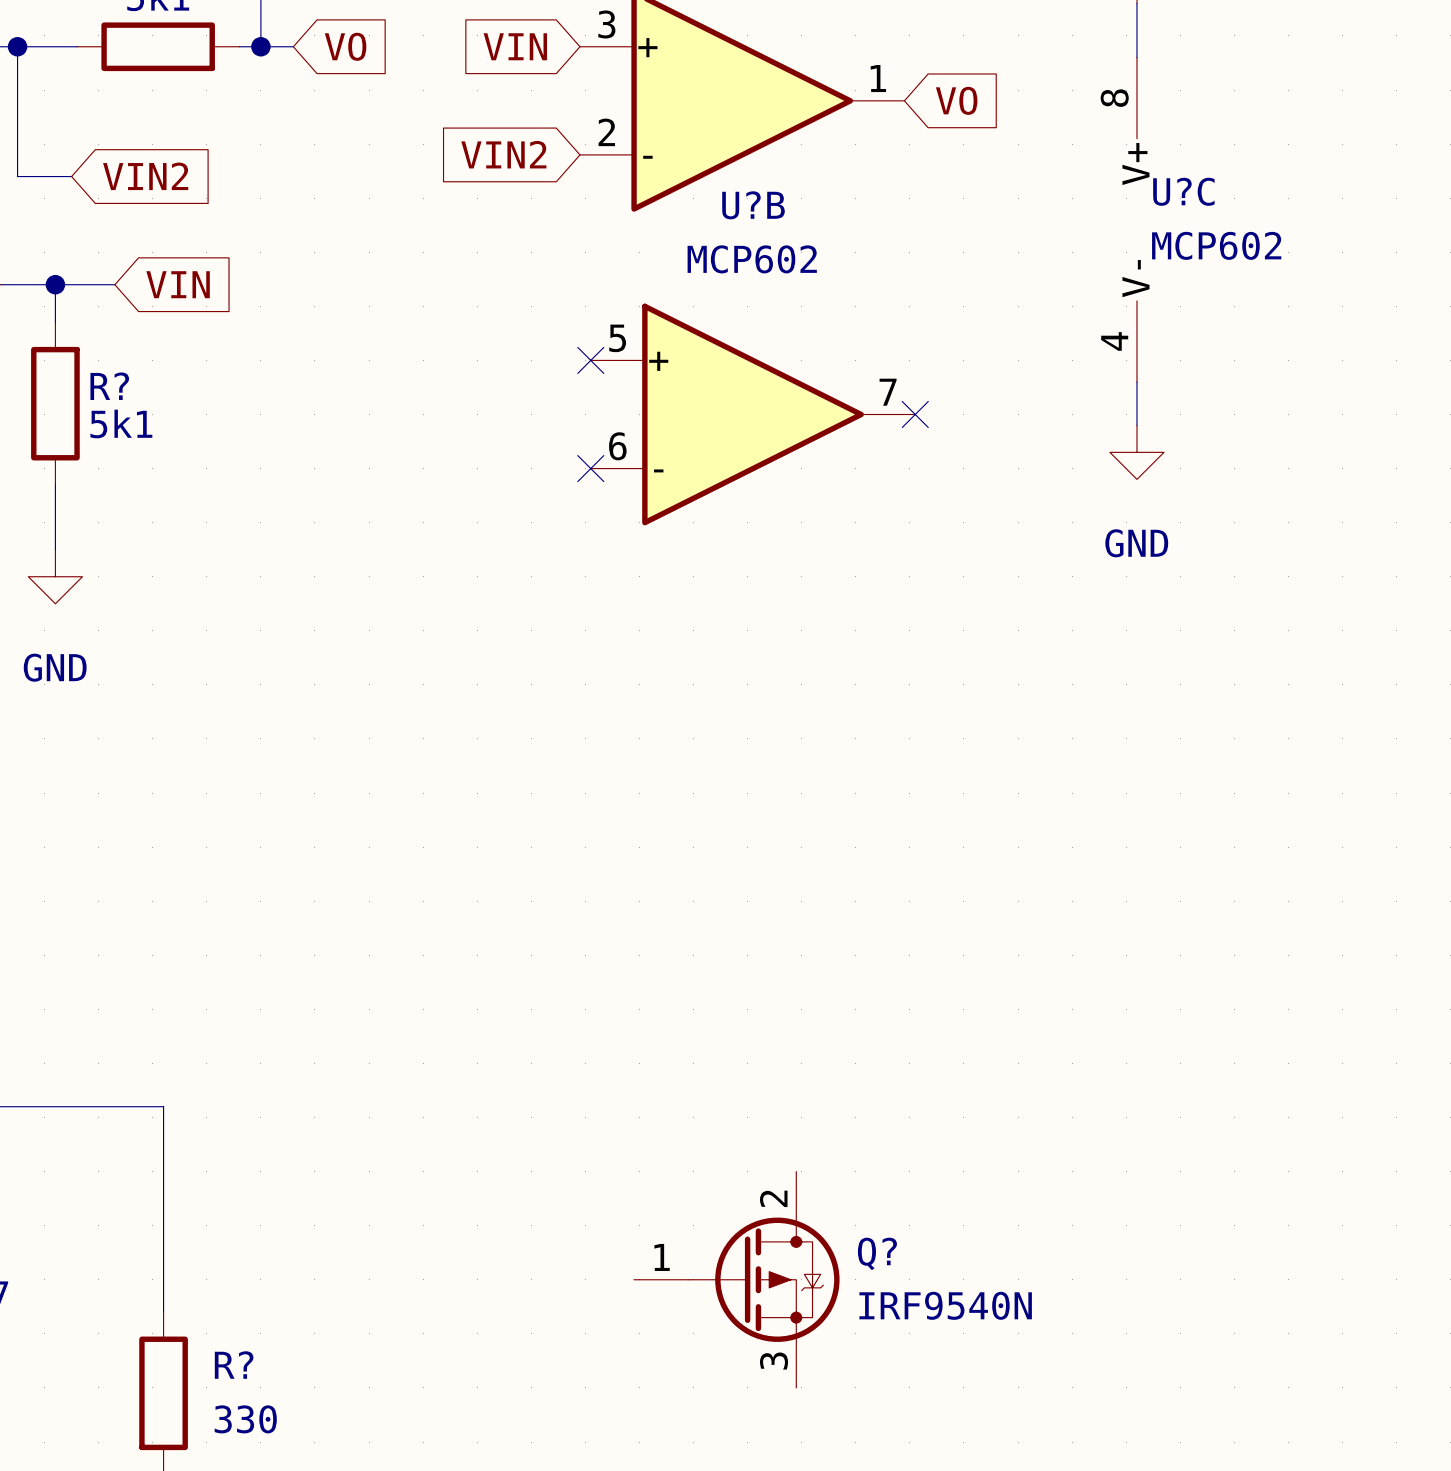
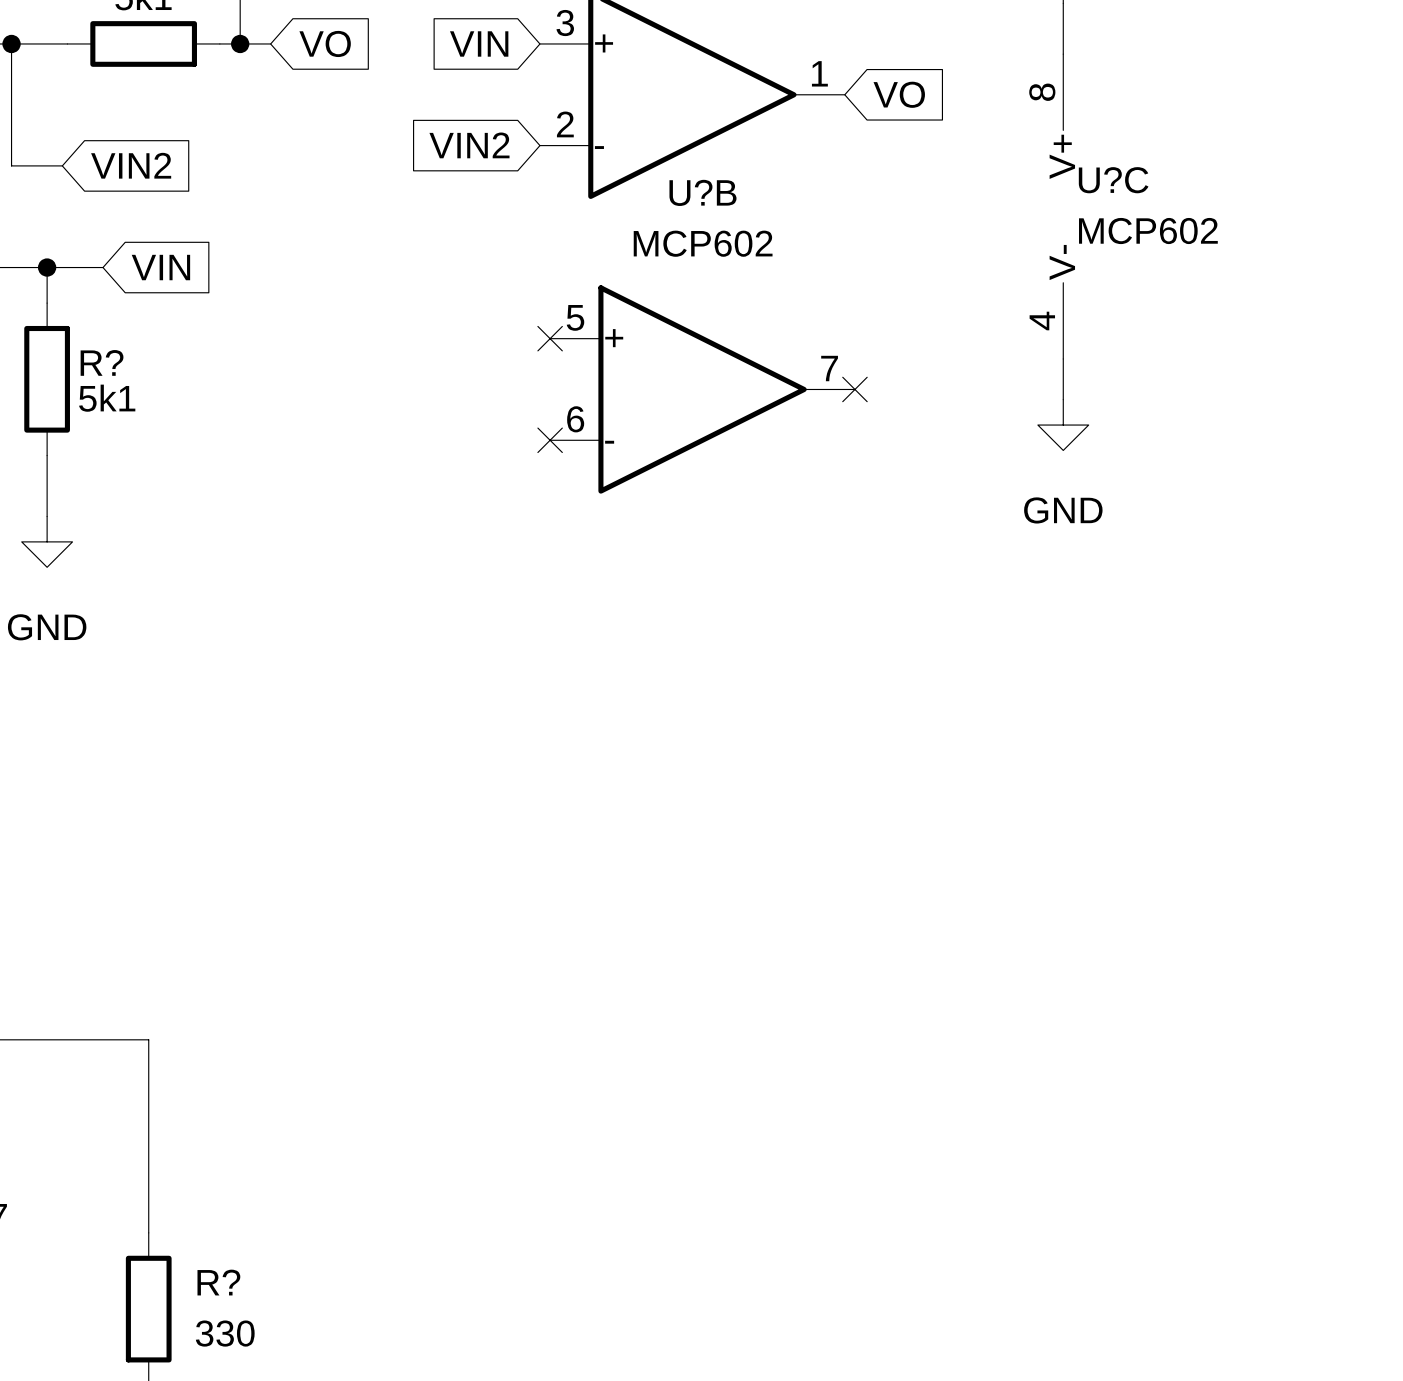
Q?: IRF9540N (736, 1279) -> none

